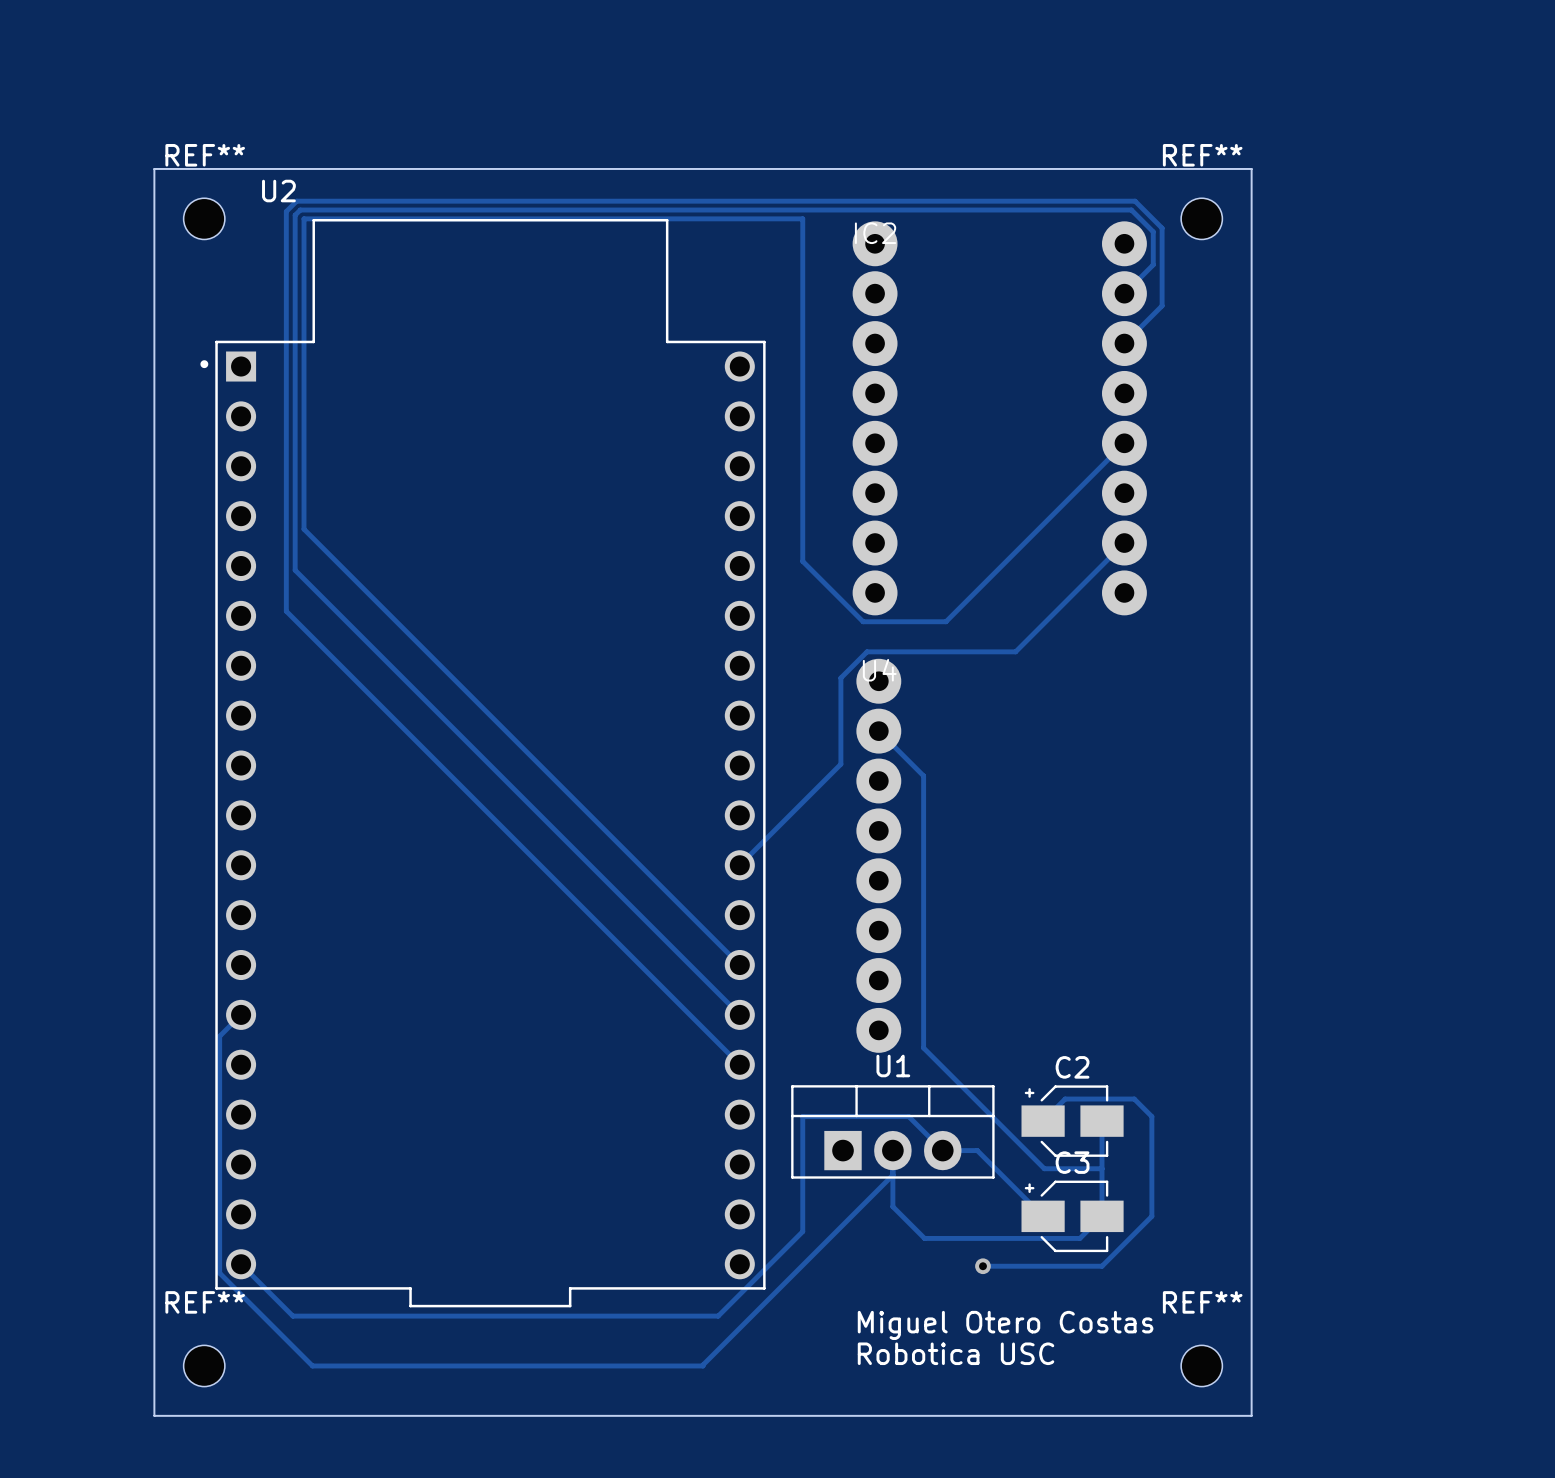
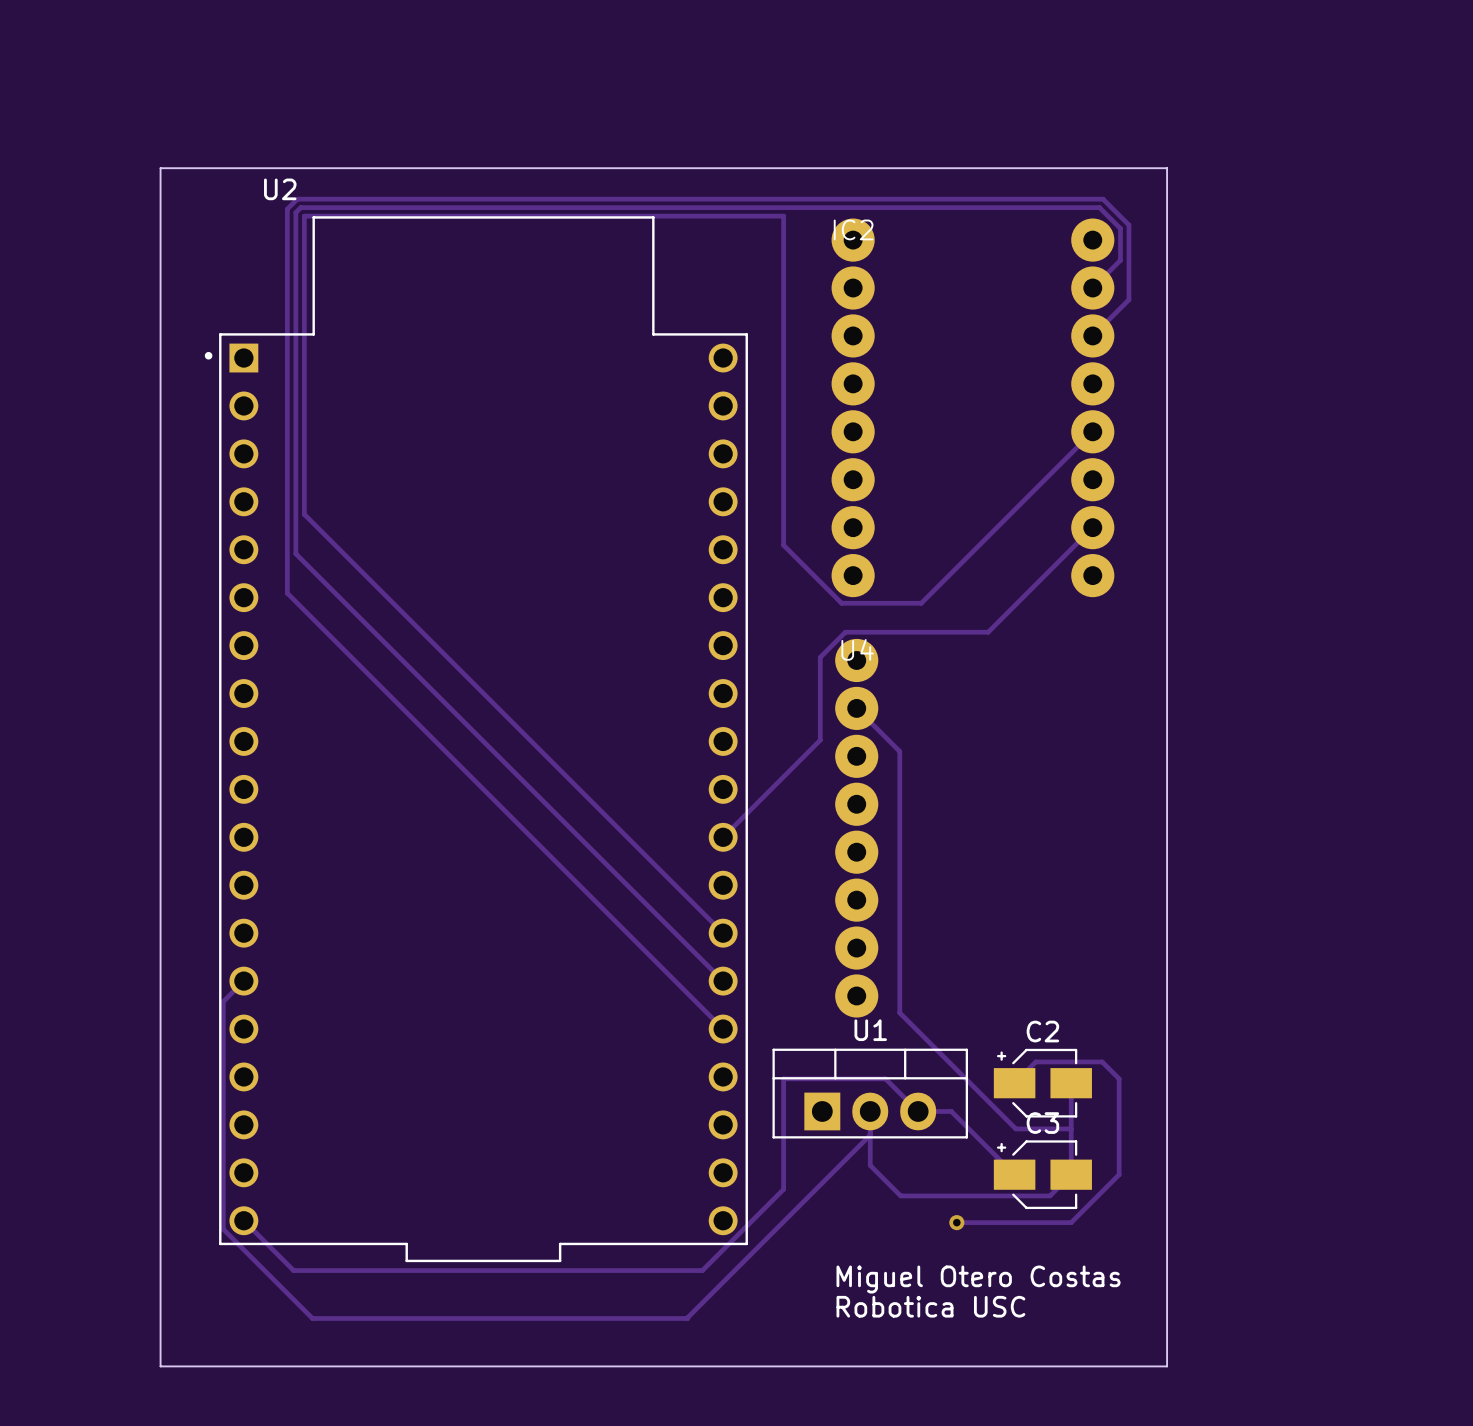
board edge: (1201, 168) (1251, 168) (1251, 1415) (1201, 1415) -> (1167, 168) (1167, 1366)
REF**: (204, 218) -> none
REF**: (1201, 218) -> none
REF**: (204, 1365) -> none
REF**: (1201, 1365) -> none

